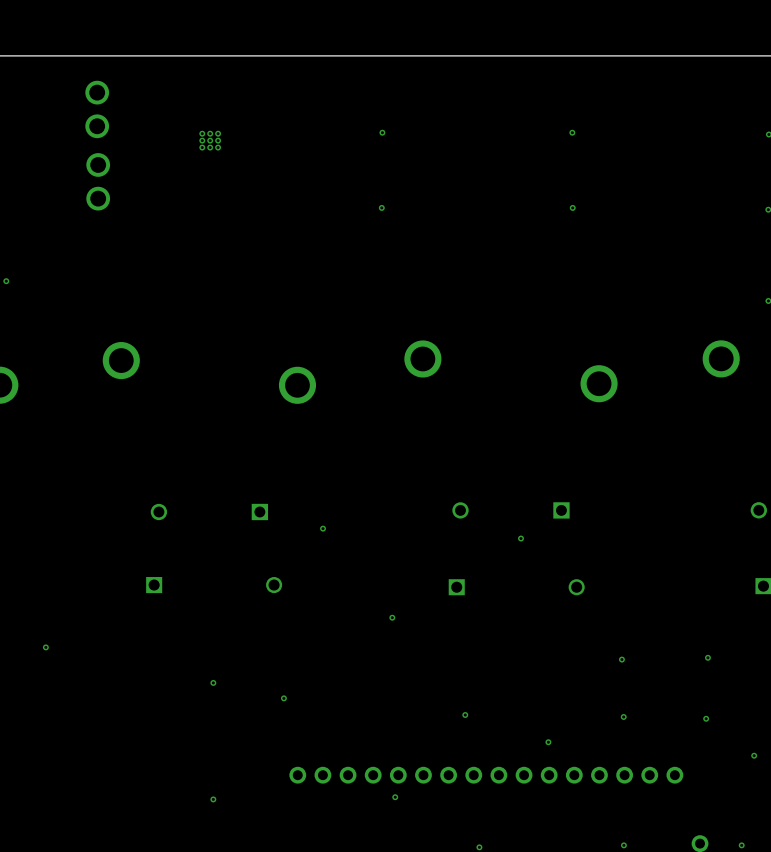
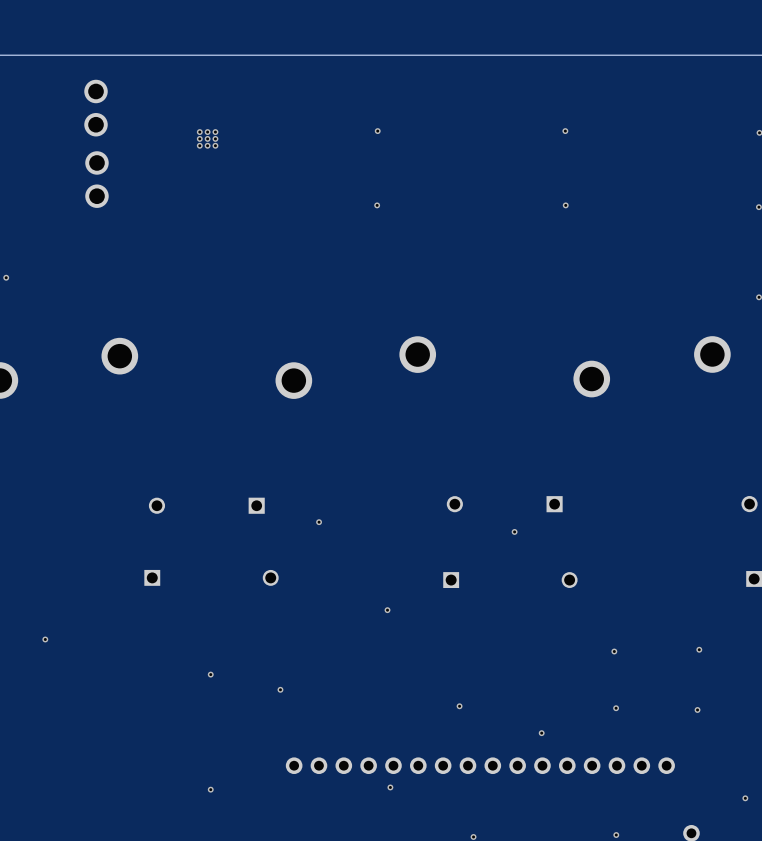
via: (754, 755) -> none
via: none -> (745, 798)
via: (741, 845) -> none

